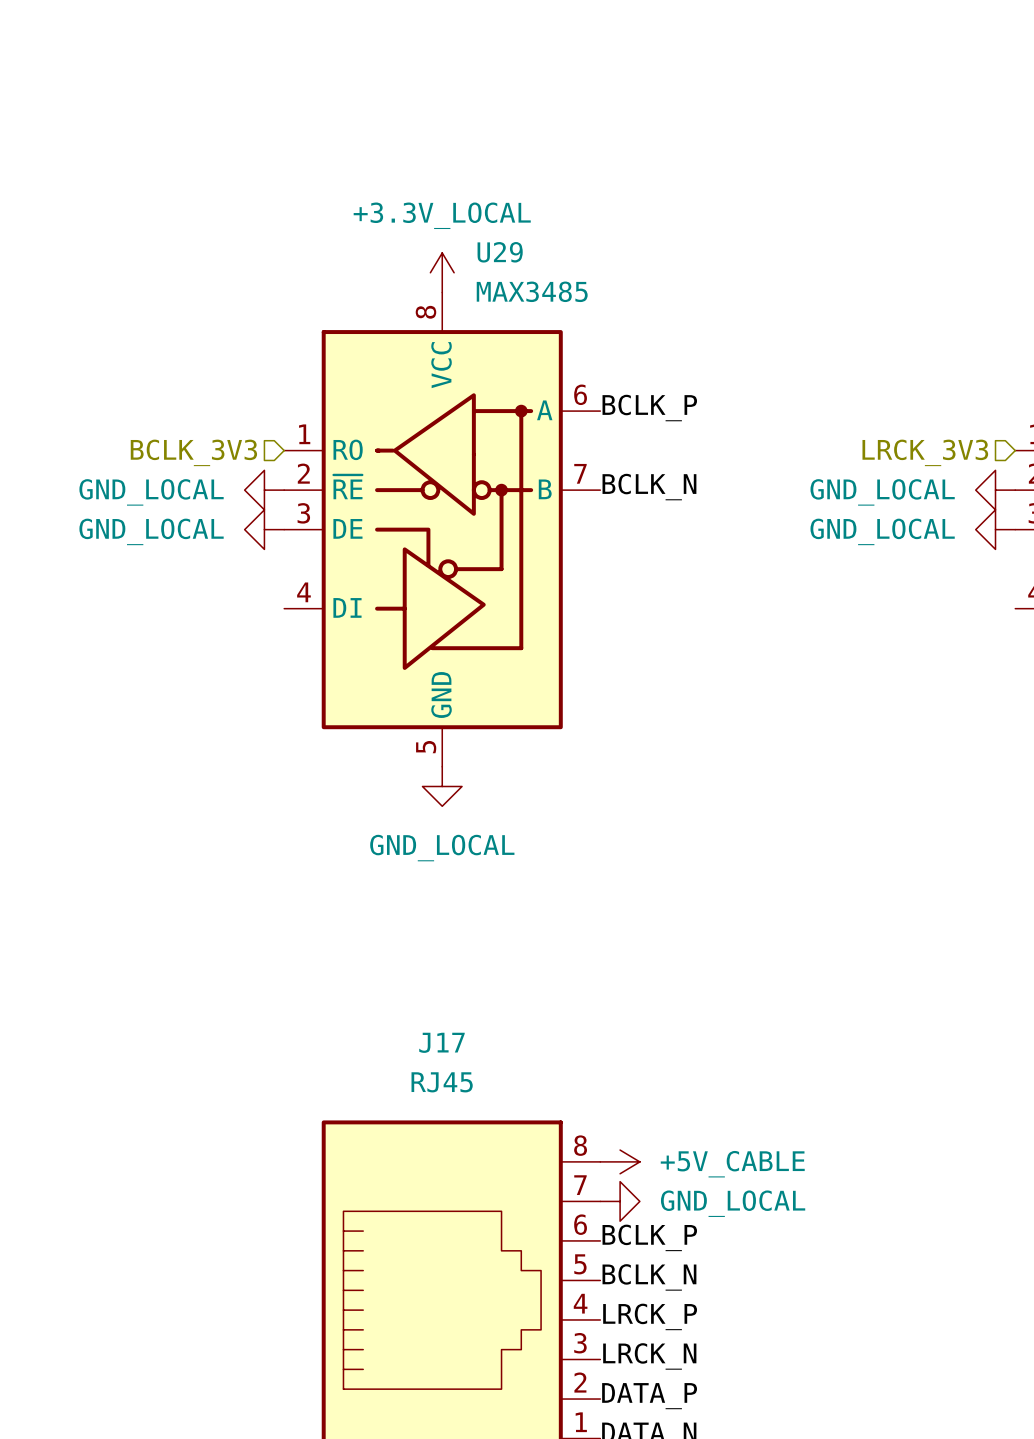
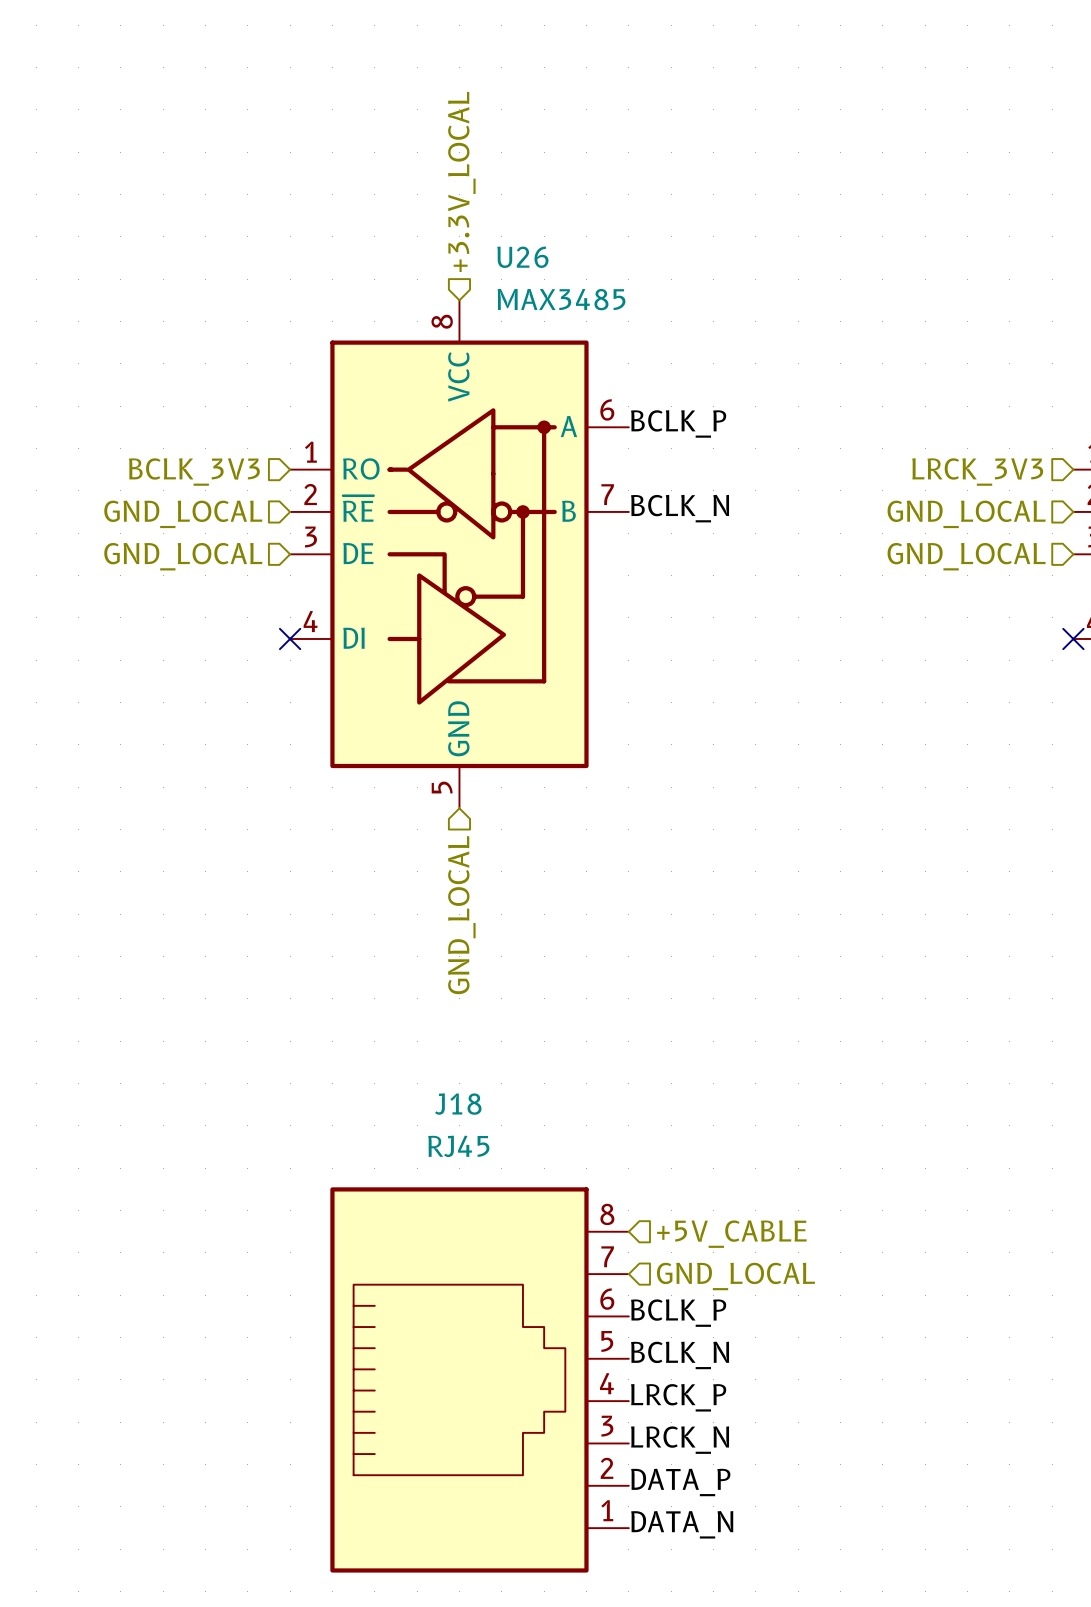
hierarchical label: none -> +3.3V_LOCAL (461, 181)
U29 name: U29 (500, 252) -> U26 (522, 257)
power symbol: +3.3V_LOCAL (442, 272) -> none
power symbol: GND_LOCAL (264, 490) -> none
power symbol: GND_LOCAL (995, 490) -> none
hierarchical label: none -> GND_LOCAL (183, 514)
hierarchical label: none -> GND_LOCAL (966, 514)
power symbol: GND_LOCAL (264, 529) -> none
power symbol: GND_LOCAL (995, 529) -> none
hierarchical label: none -> GND_LOCAL (183, 556)
hierarchical label: none -> GND_LOCAL (966, 556)
no-connect mark: none -> (290, 638)
no-connect mark: none -> (1073, 638)
power symbol: GND_LOCAL (442, 786) -> none
hierarchical label: none -> GND_LOCAL (461, 915)
J17 name: J17 (441, 1042) -> J18 (458, 1104)
power symbol: +5V_CABLE (620, 1161) -> none
hierarchical label: none -> +5V_CABLE (731, 1234)
power symbol: GND_LOCAL (620, 1201) -> none
hierarchical label: none -> GND_LOCAL (735, 1276)

